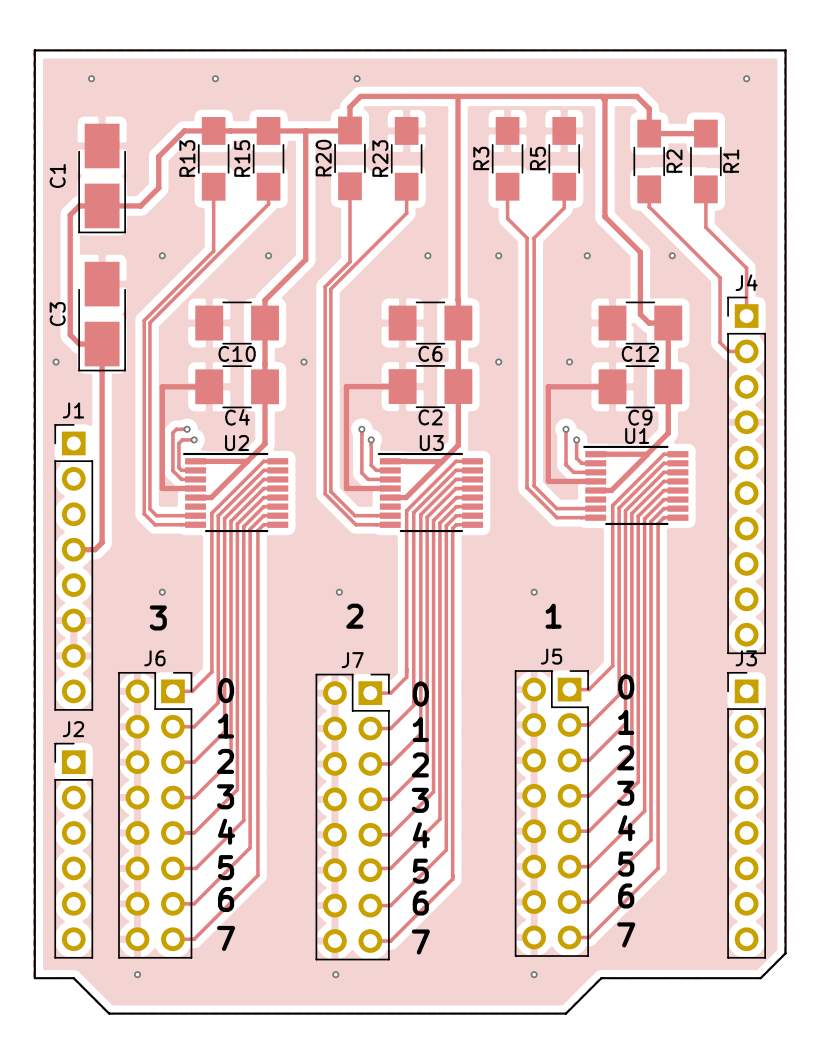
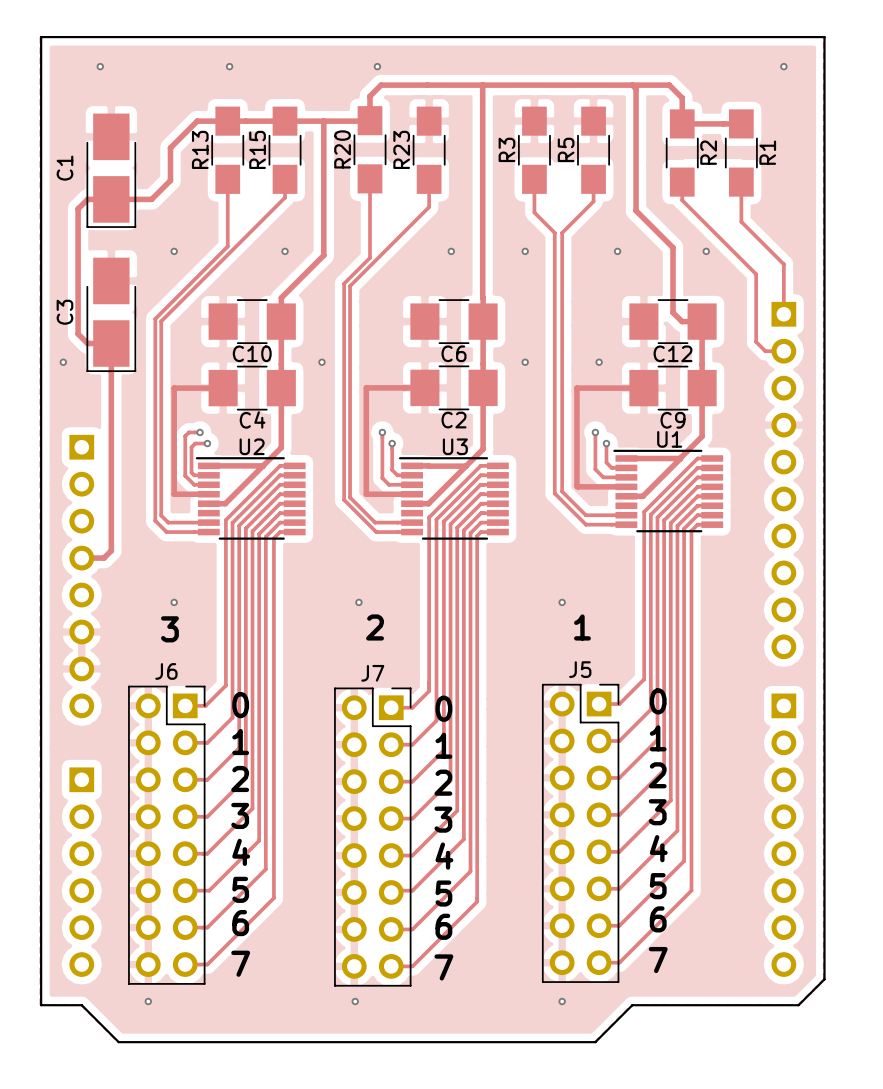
J4 side: top (746, 475) -> bottom (783, 480)
J1 side: top (73, 567) -> bottom (81, 576)
J3 side: top (746, 815) -> bottom (783, 835)
J2 side: top (73, 850) -> bottom (81, 872)

